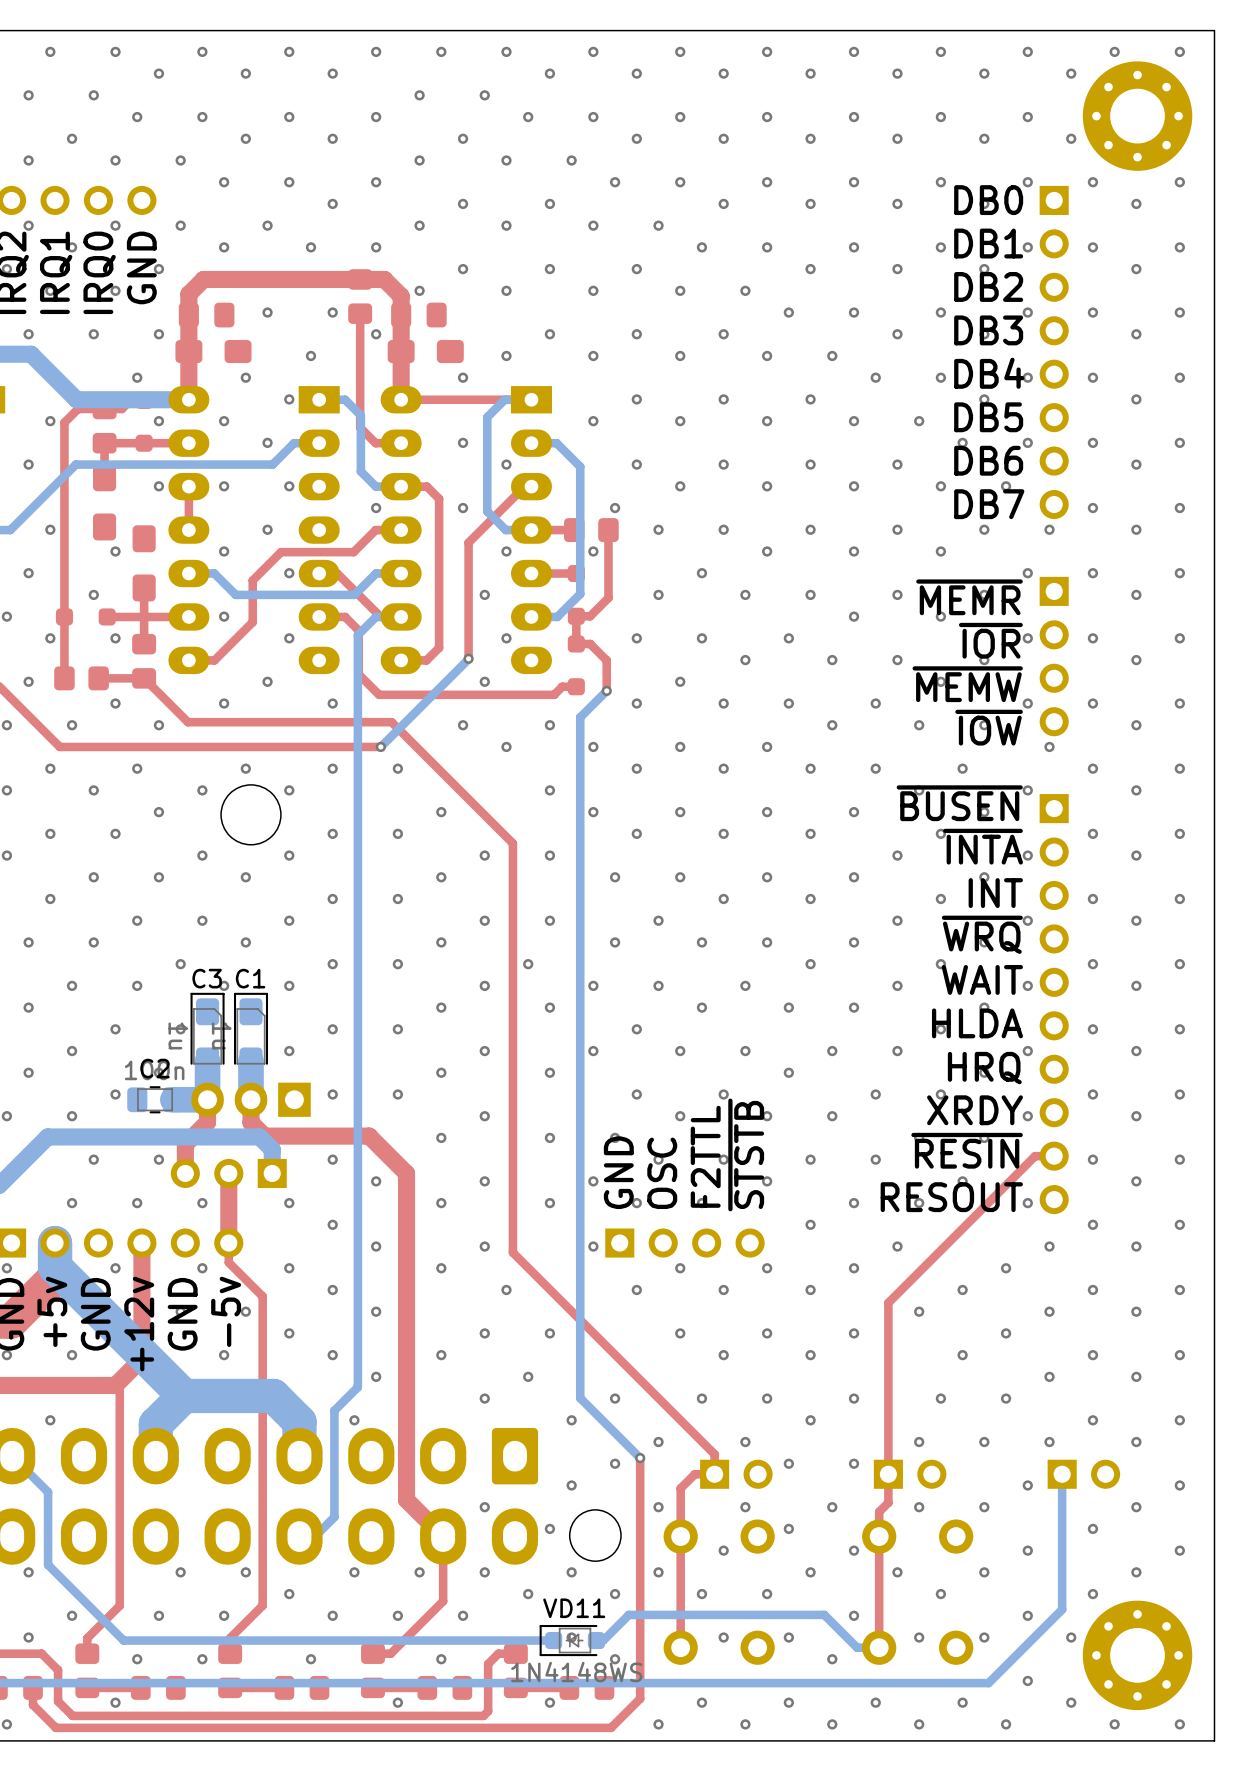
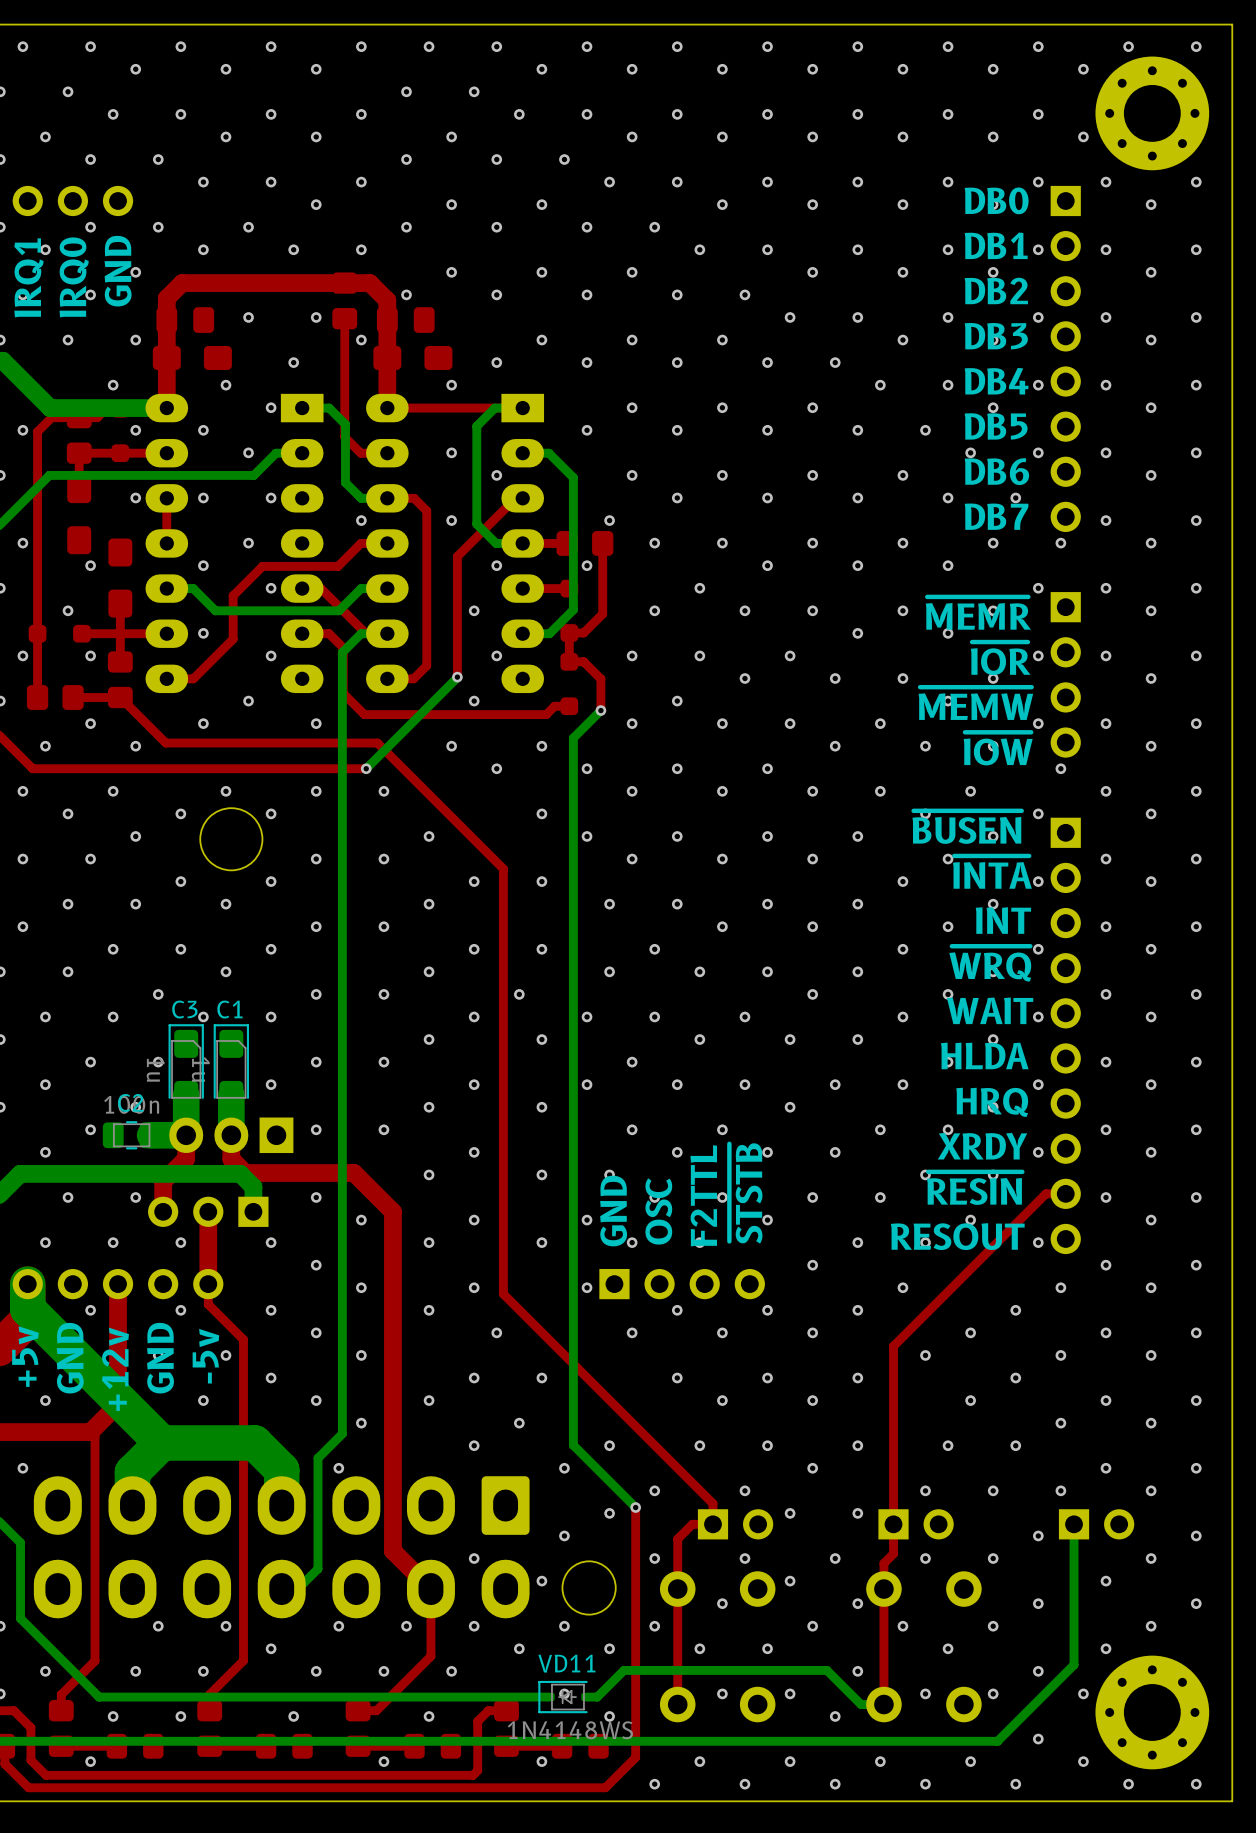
VD11 footprint: [539, 1624, 605, 1657] -> [538, 1680, 592, 1714]

